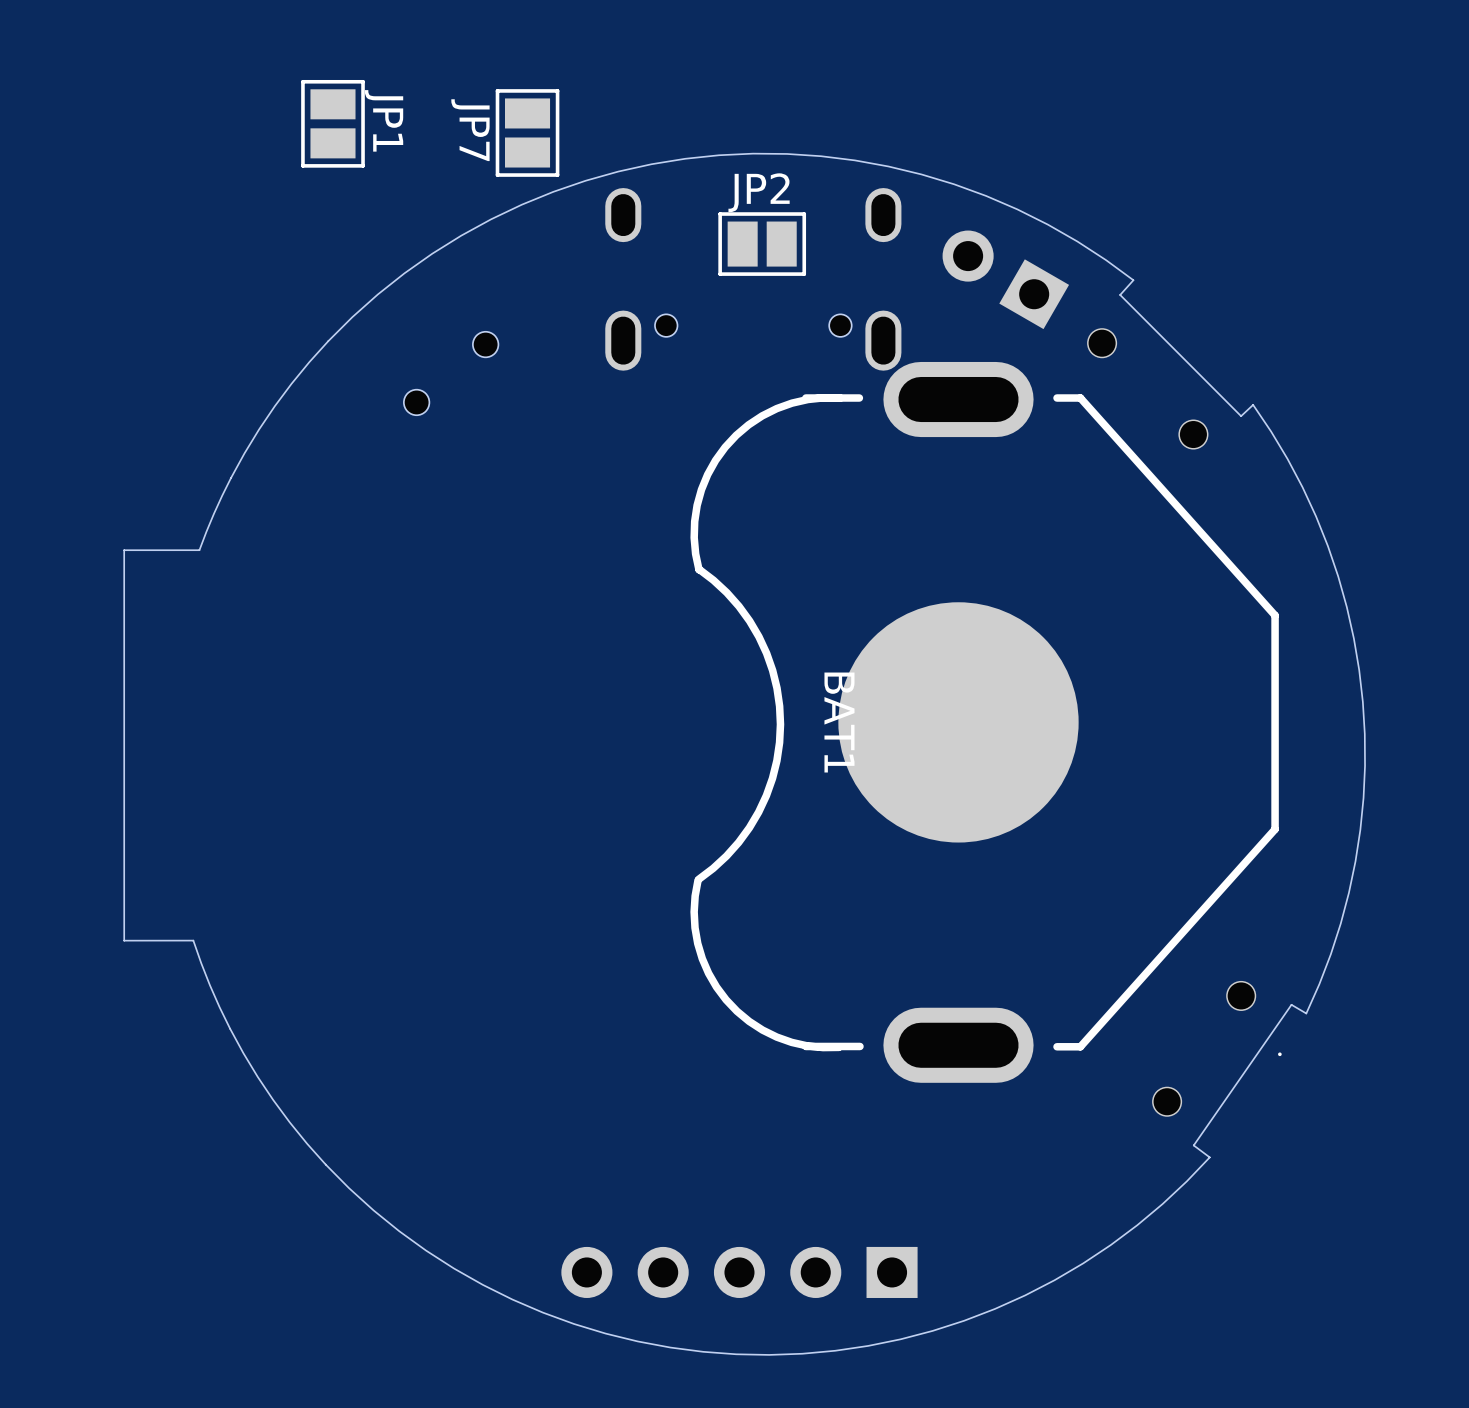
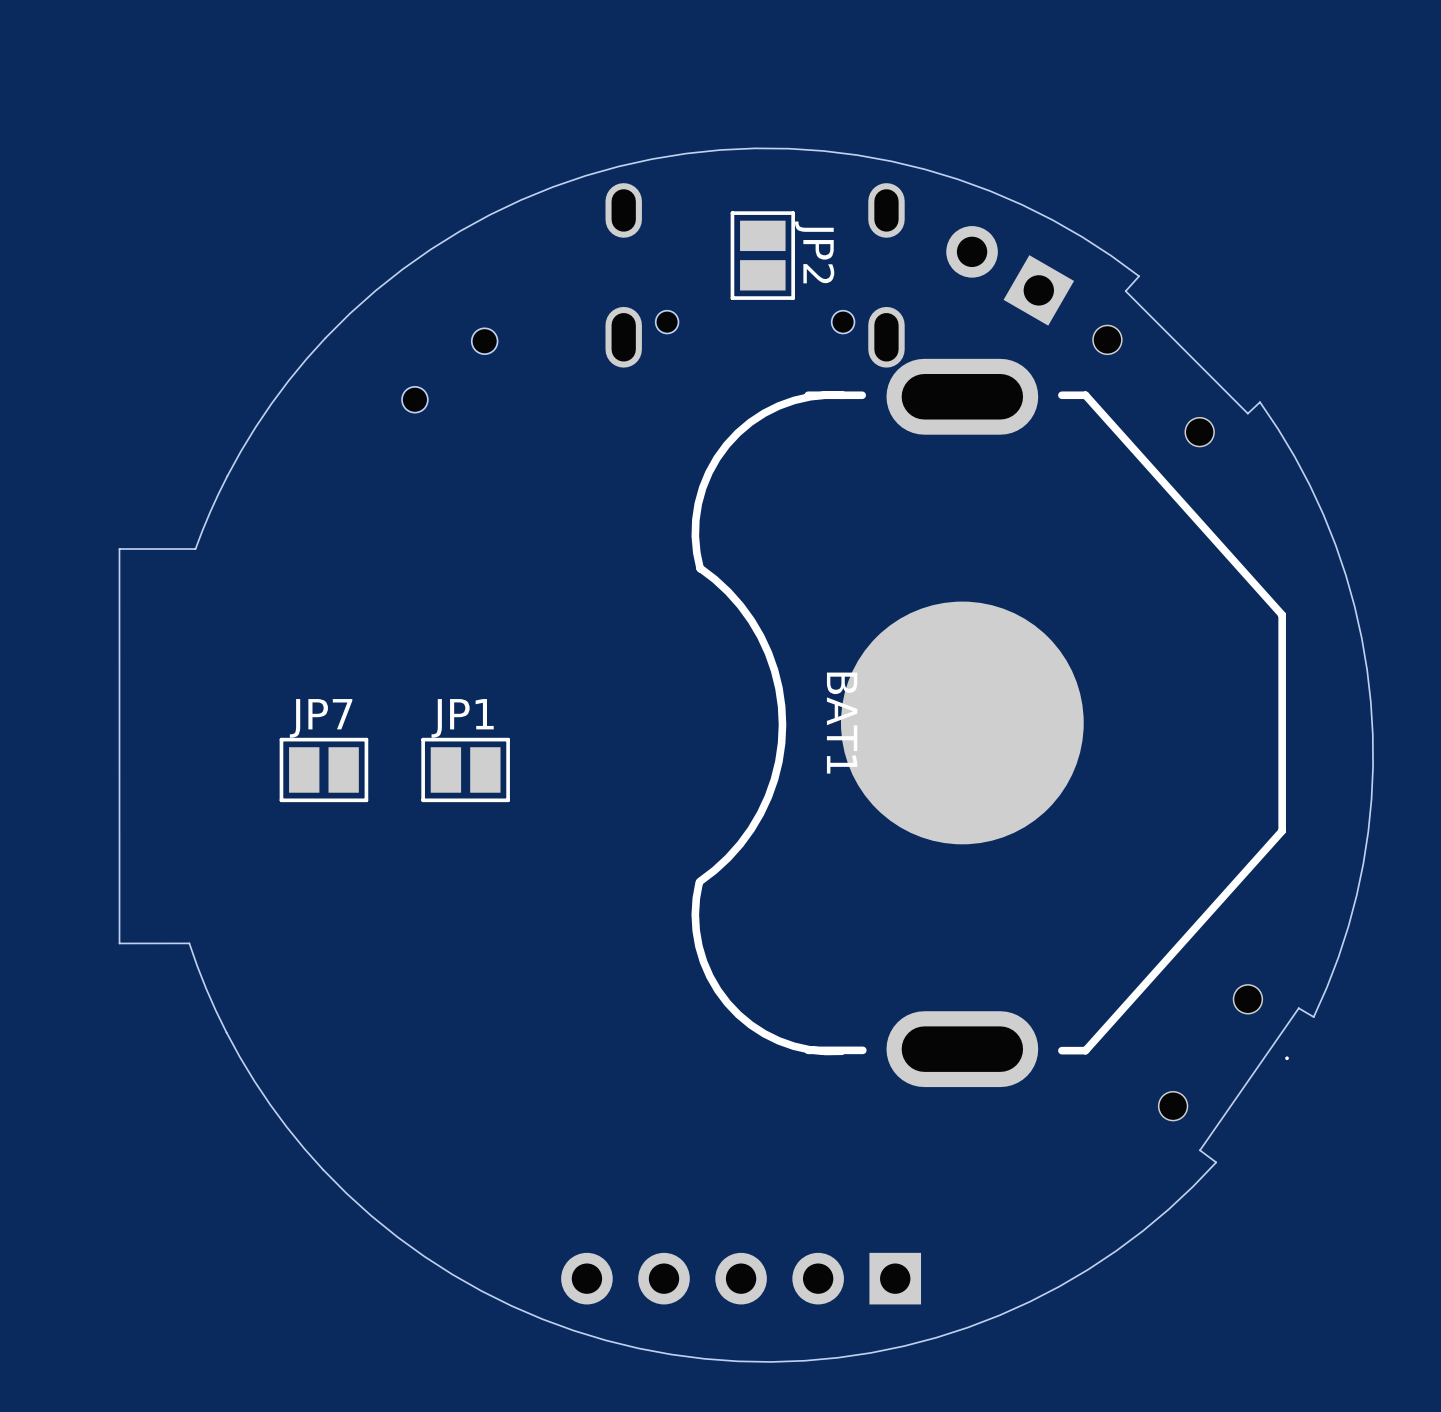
JP1 name position: JP1 (384, 120) -> JP1 (462, 718)
JP1 rotation: 0° (332, 123) -> 90° clockwise (465, 769)
JP1 position: (332, 123) -> (465, 769)
JP7 rotation: 0° (527, 132) -> 90° clockwise (323, 769)
JP7 position: (527, 132) -> (323, 769)
JP2 rotation: 0° (762, 244) -> 90° clockwise (762, 255)

